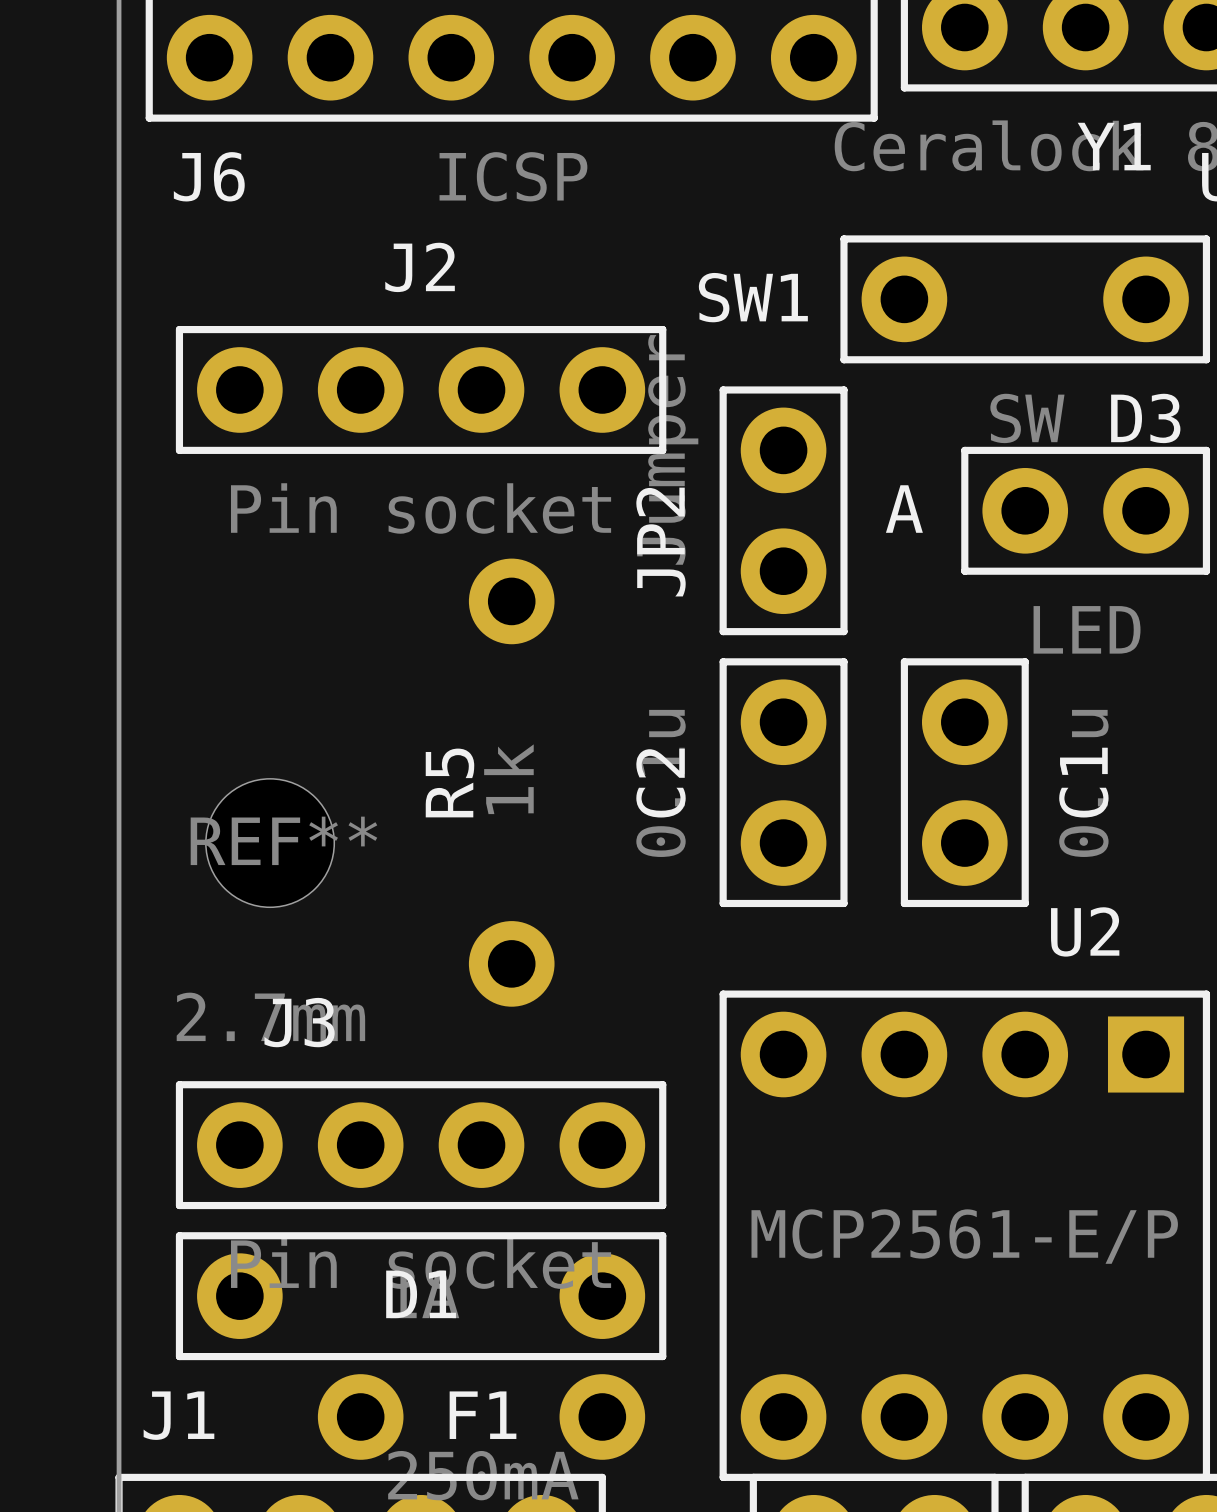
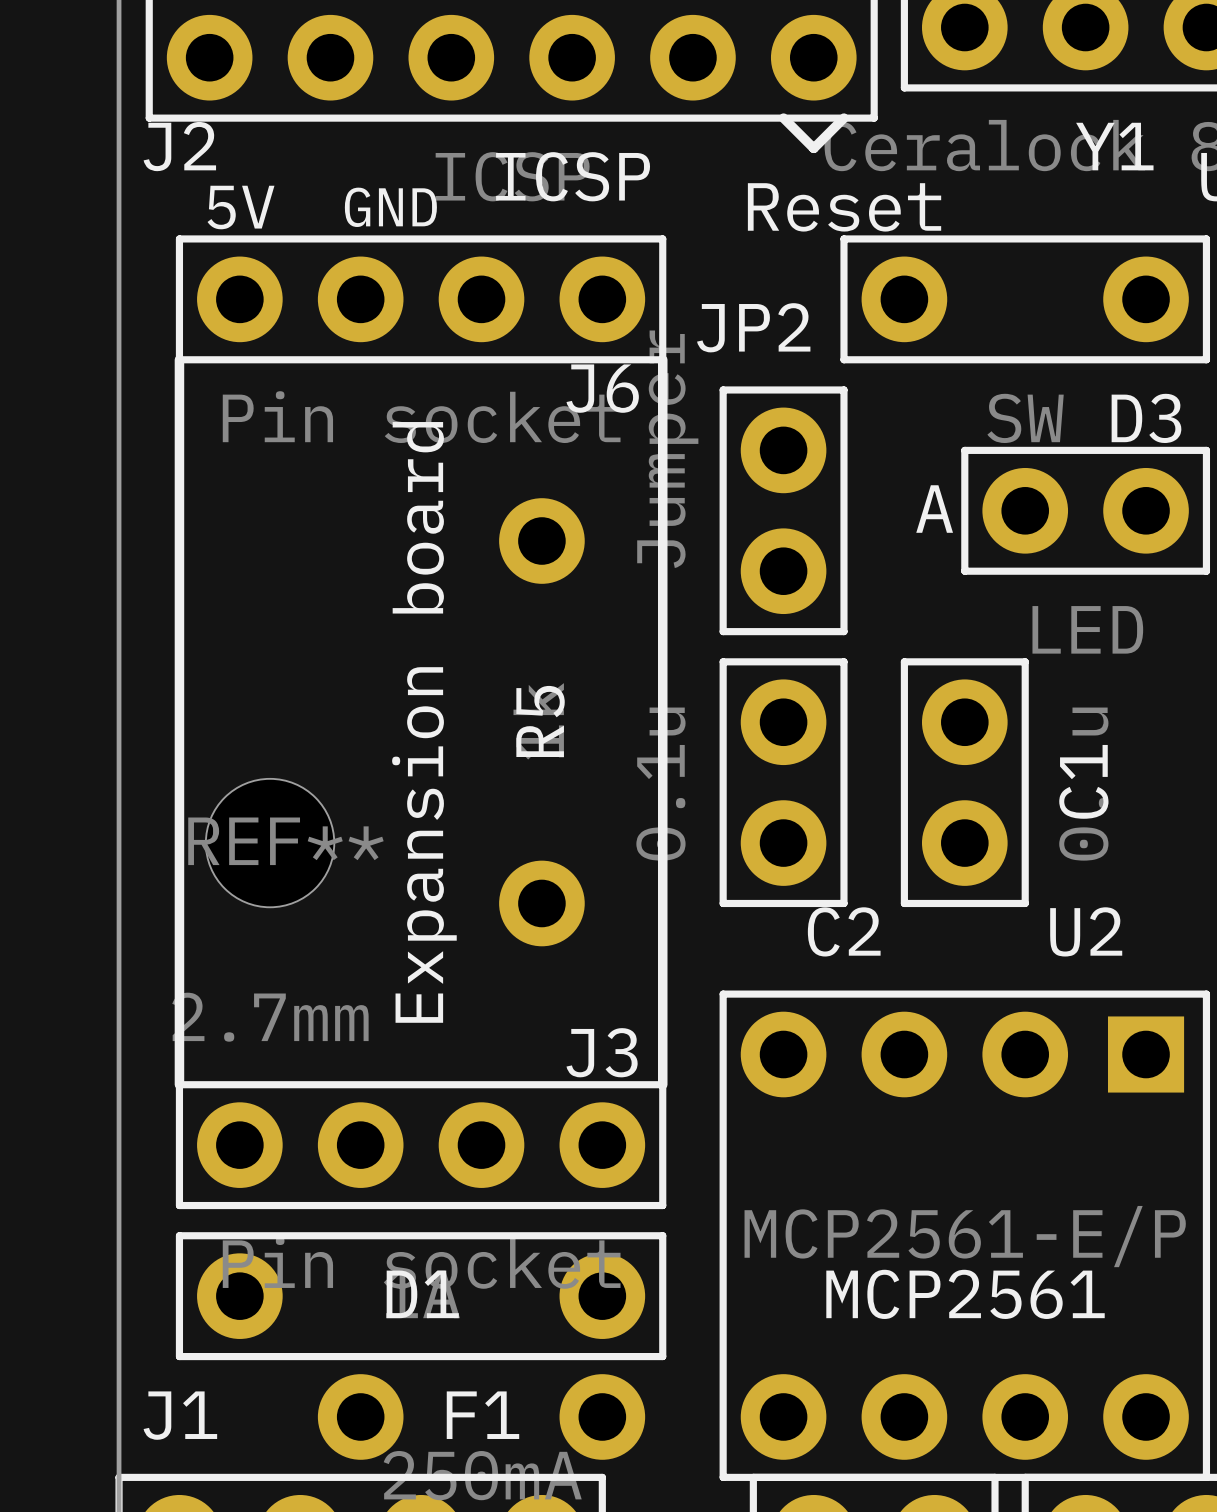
line: none -> (783, 118) (813, 148) (843, 118)
J6 name position: J6 (209, 176) -> J6 (602, 388)
text: none -> ICSP (573, 176)
text: none -> 5V (241, 207)
text: none -> GND (390, 207)
J2 name position: J2 (420, 267) -> J2 (179, 146)
SW1 name: SW1 (753, 297) -> Reset (844, 207)
line: none -> (179, 359) (179, 1084)
line: none -> (662, 359) (662, 1084)
J2 position: (421, 389) -> (421, 299)
D3 text position: A (904, 509) -> A (934, 509)
JP2 name rotation: 0° (661, 542) -> 90° clockwise (753, 327)
JP2 name position: JP2 (661, 542) -> JP2 (753, 327)
text: none -> Expansion board (424, 722)
R5 name position: R5 (449, 782) -> R5 (540, 721)
R5 position: (511, 782) -> (541, 722)
C2 name rotation: 0° (661, 783) -> 90° clockwise (844, 931)
C2 name position: C2 (661, 783) -> C2 (844, 931)
J3 name position: J3 (299, 1022) -> J3 (602, 1052)
text: none -> MCP2561 (965, 1294)

